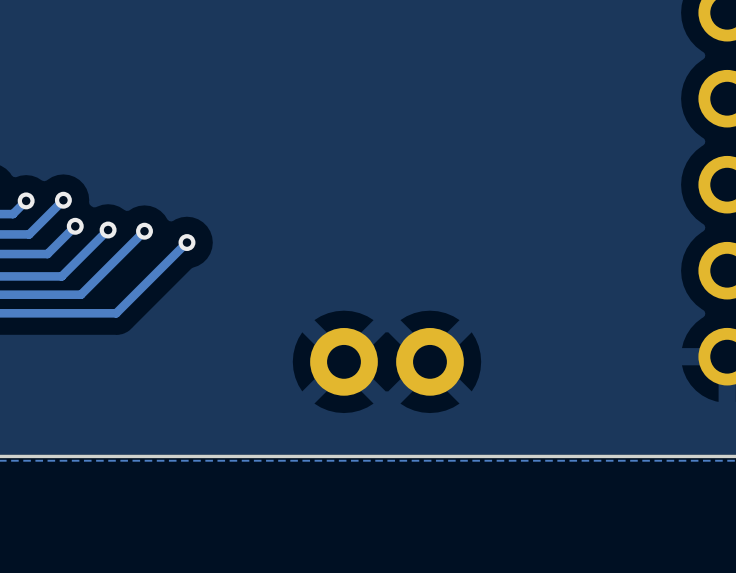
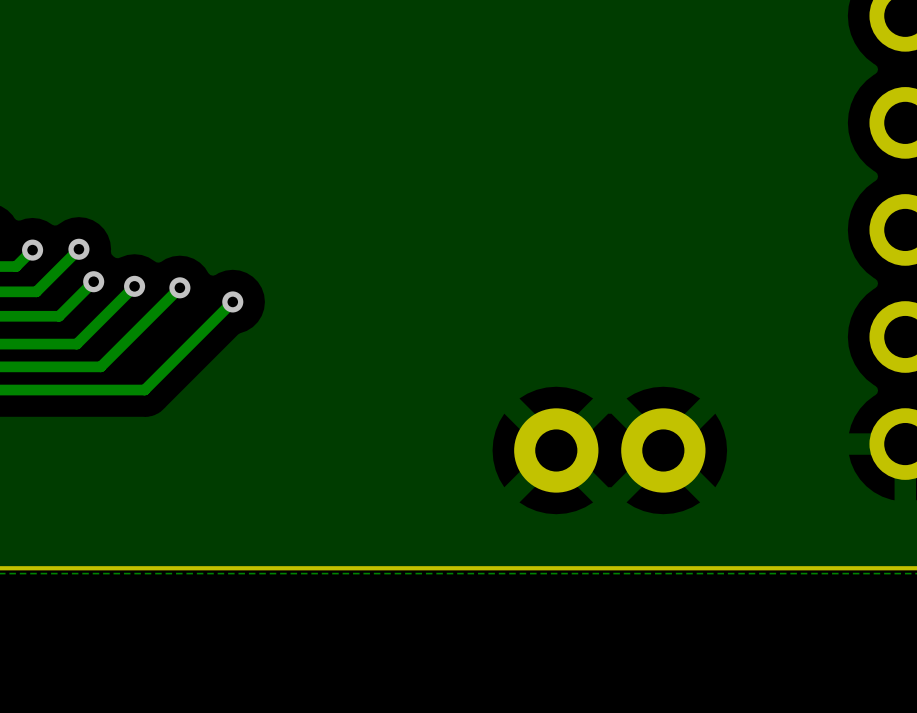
part position: (386, 361) -> (609, 450)

